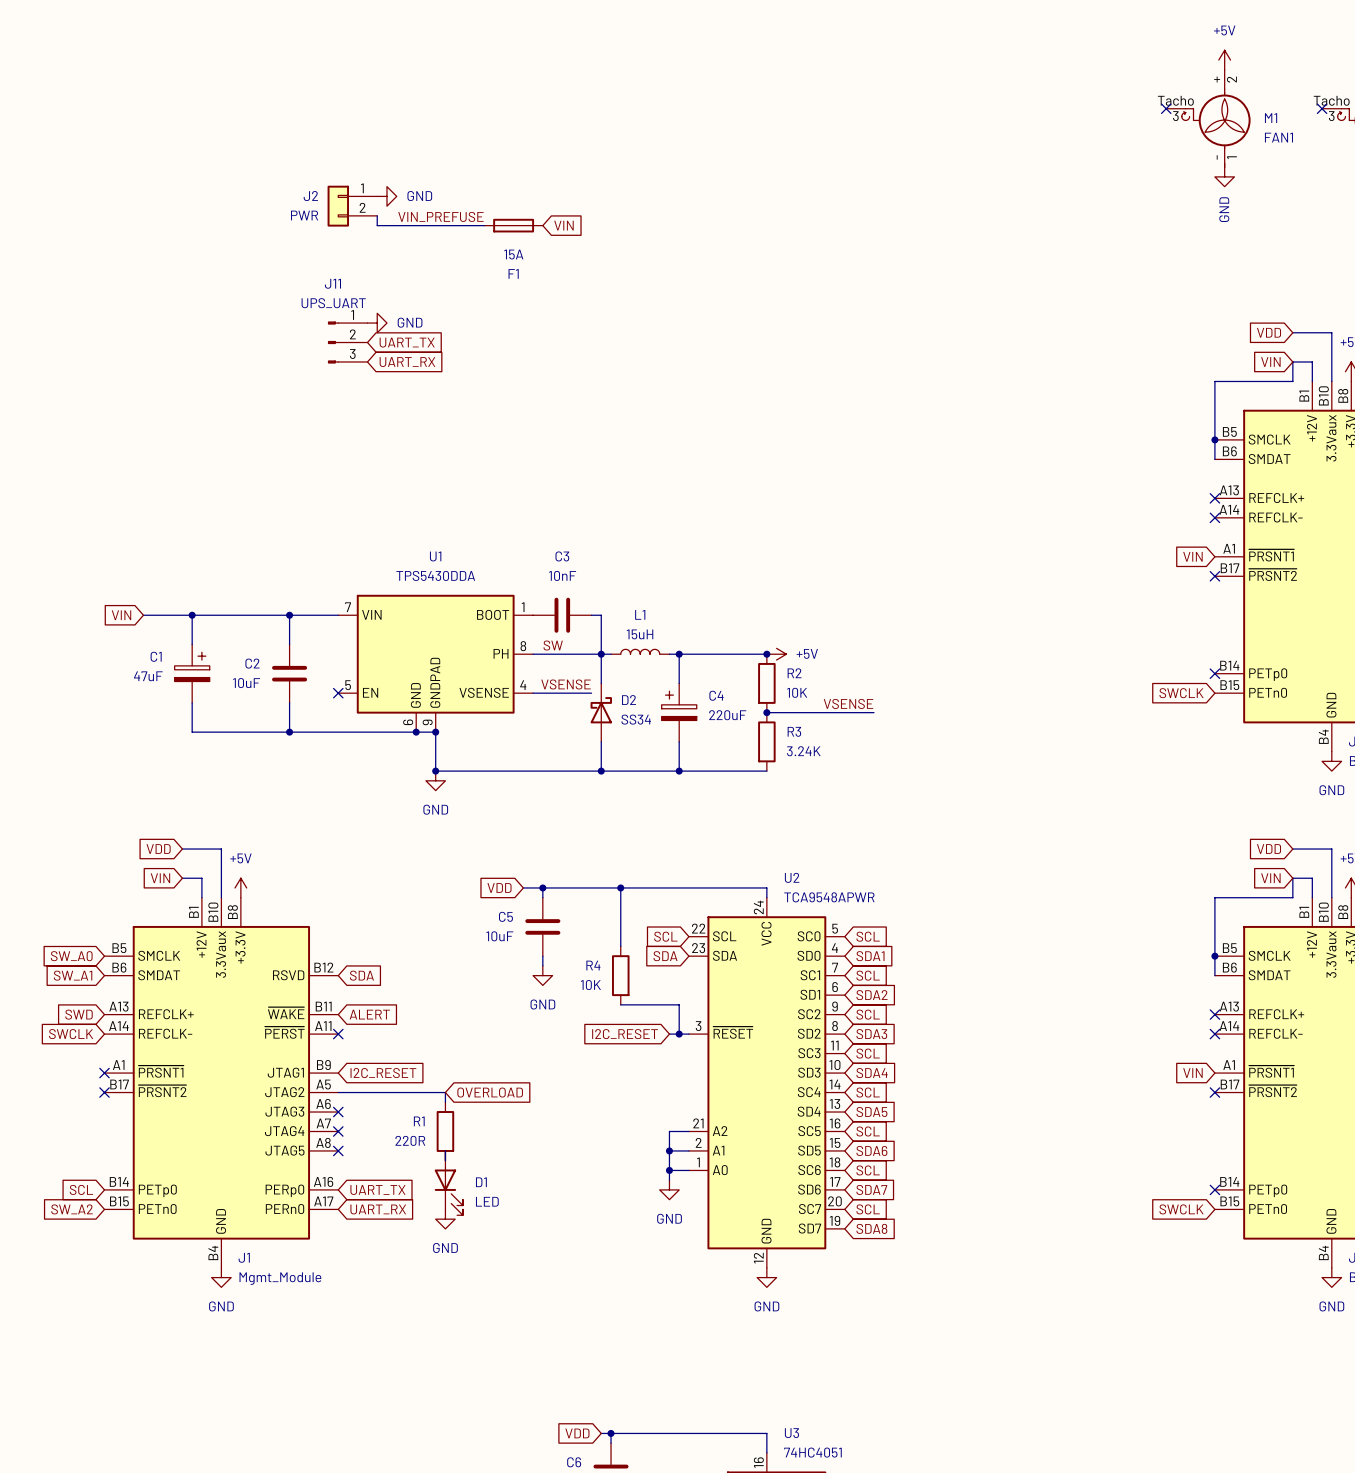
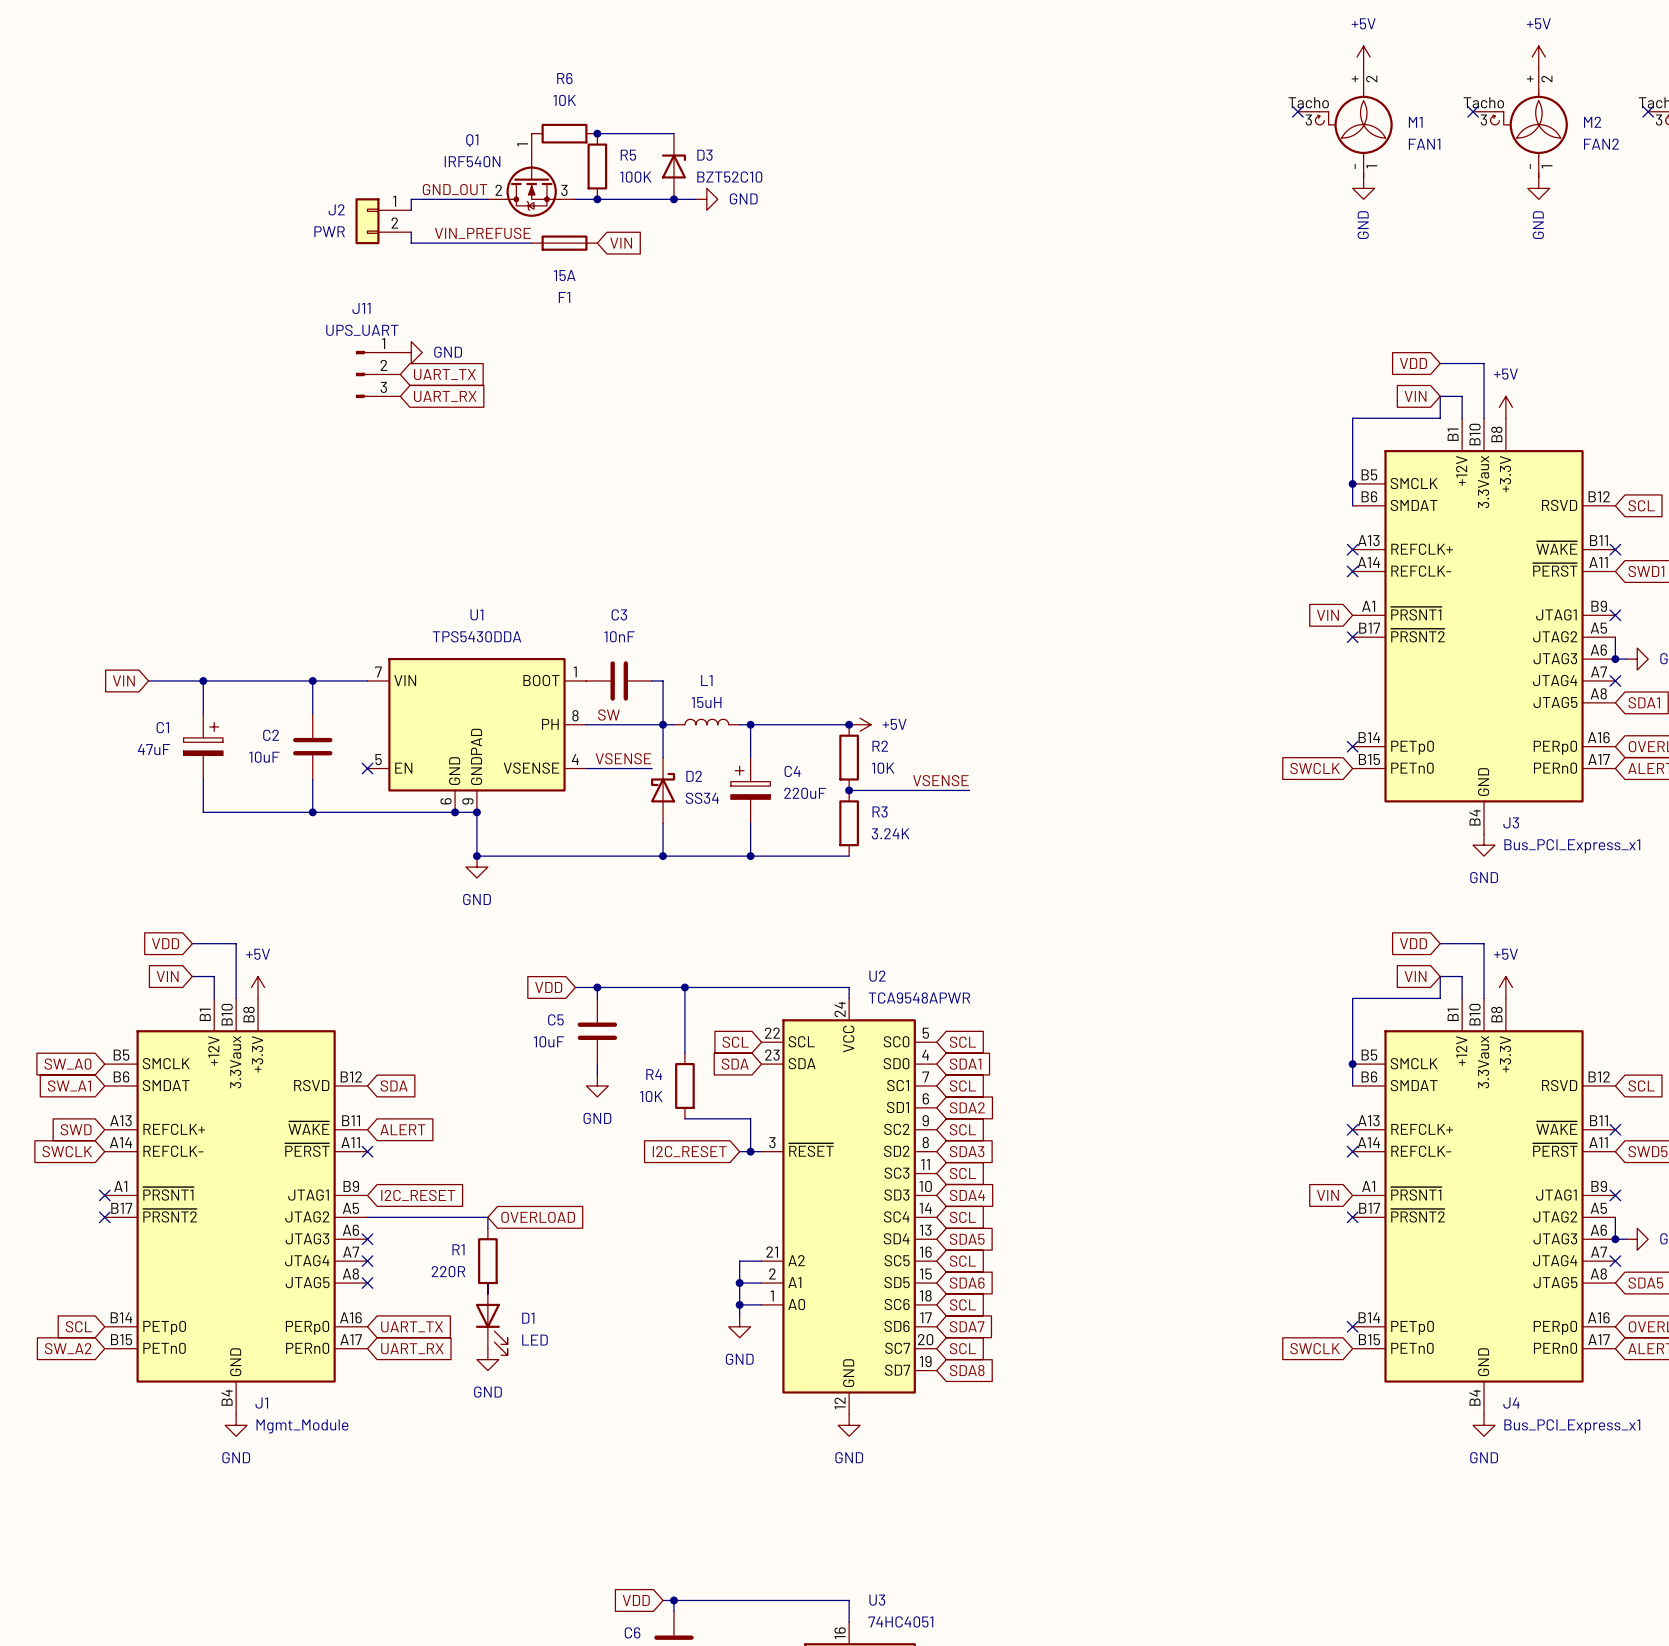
R6: none -> 10K (564, 133)
wire: none -> (597, 133) (673, 133)
junction: none -> (597, 133)
R5: none -> 100K (597, 166)
D3: none -> BZT52C10 (673, 166)
Q1: none -> IRF540N (531, 175)
label: none -> GND_OUT (455, 189)
wire: none -> (487, 199) (411, 199) (411, 210)
wire: none -> (575, 199) (695, 199)
junction: none -> (597, 199)
junction: none -> (673, 199)
power symbol: none -> GND (706, 199)
power symbol: GND (386, 196) -> none

